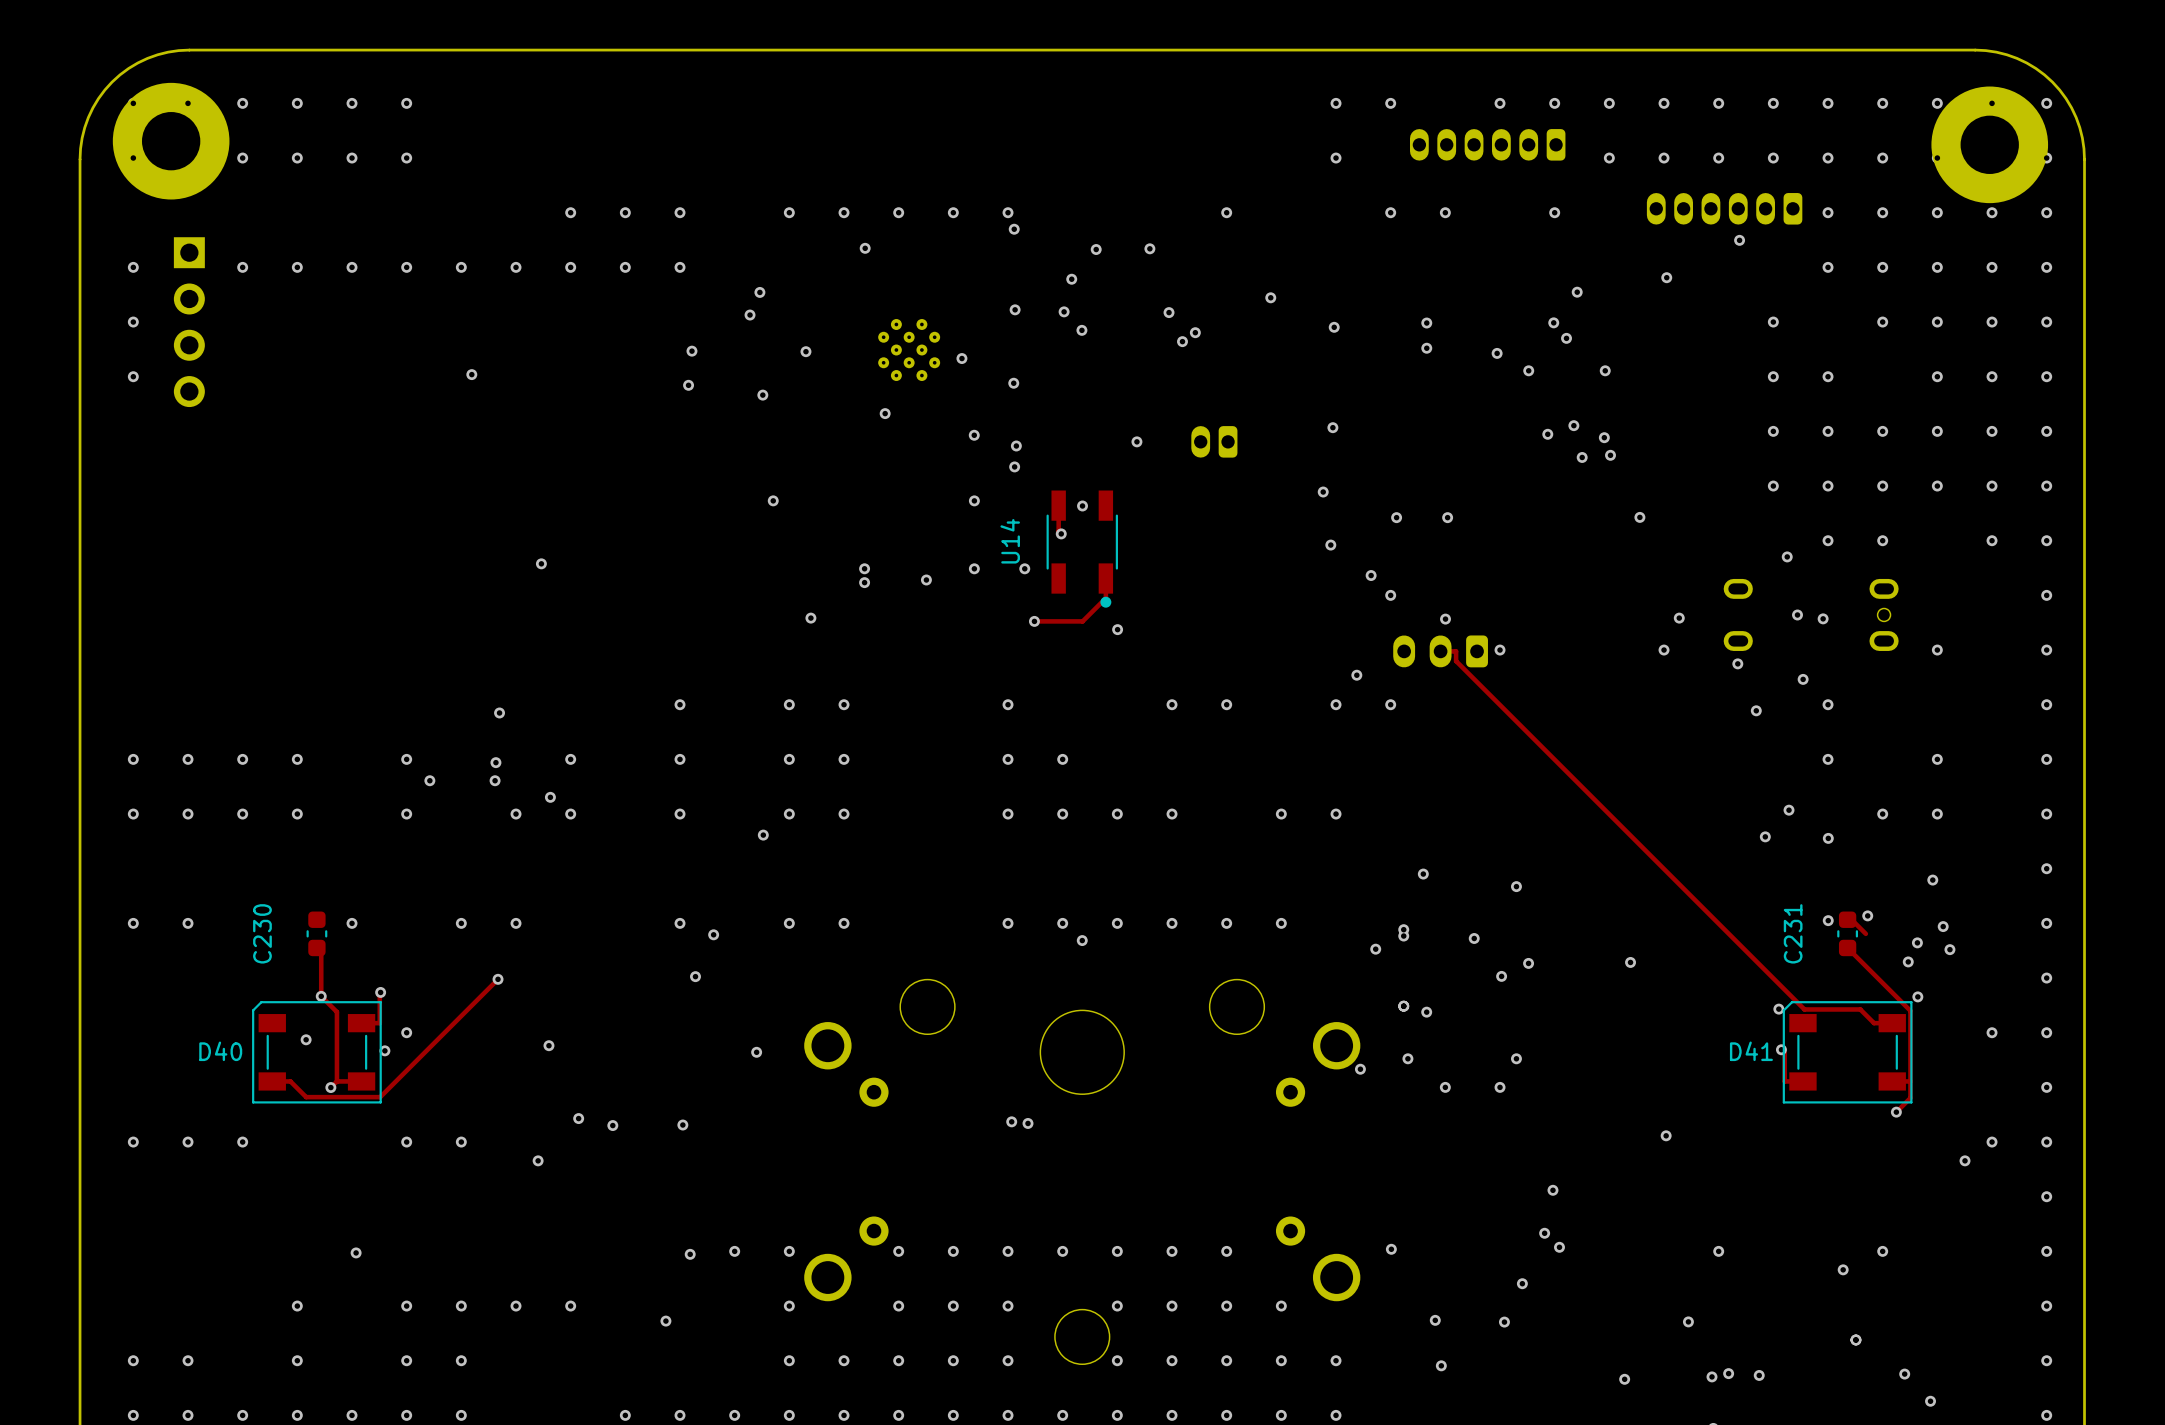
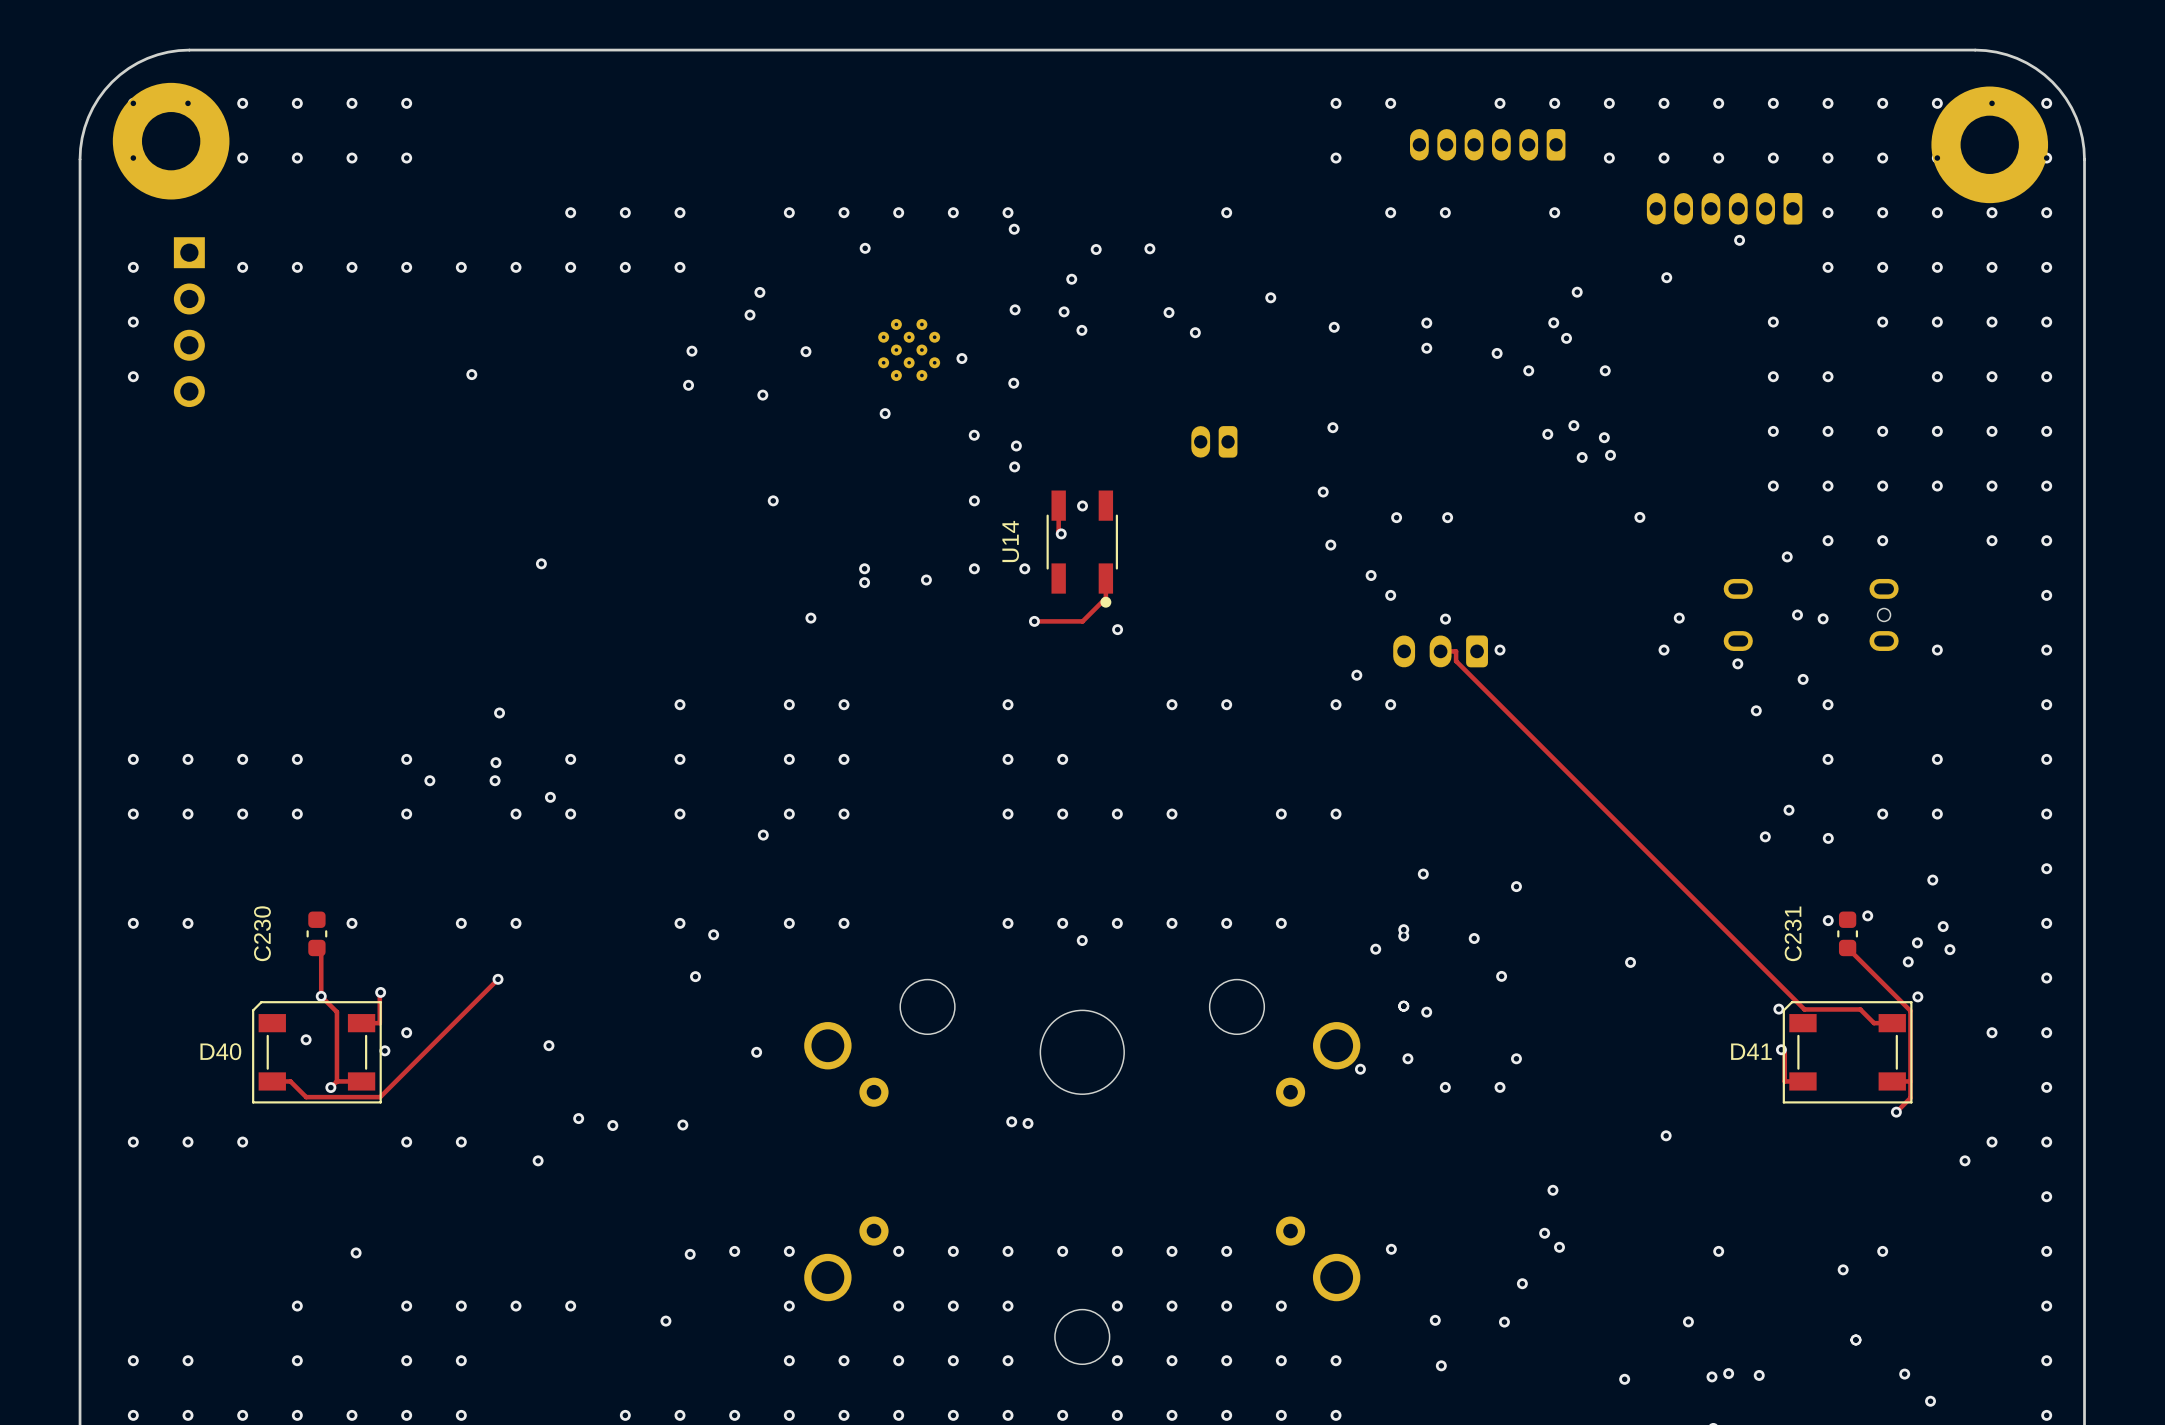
via: (1182, 341) -> none
via: (1136, 441) -> none
track: (1847, 919) (1851, 919) (1865, 933) -> none
via: (1528, 963) -> none

